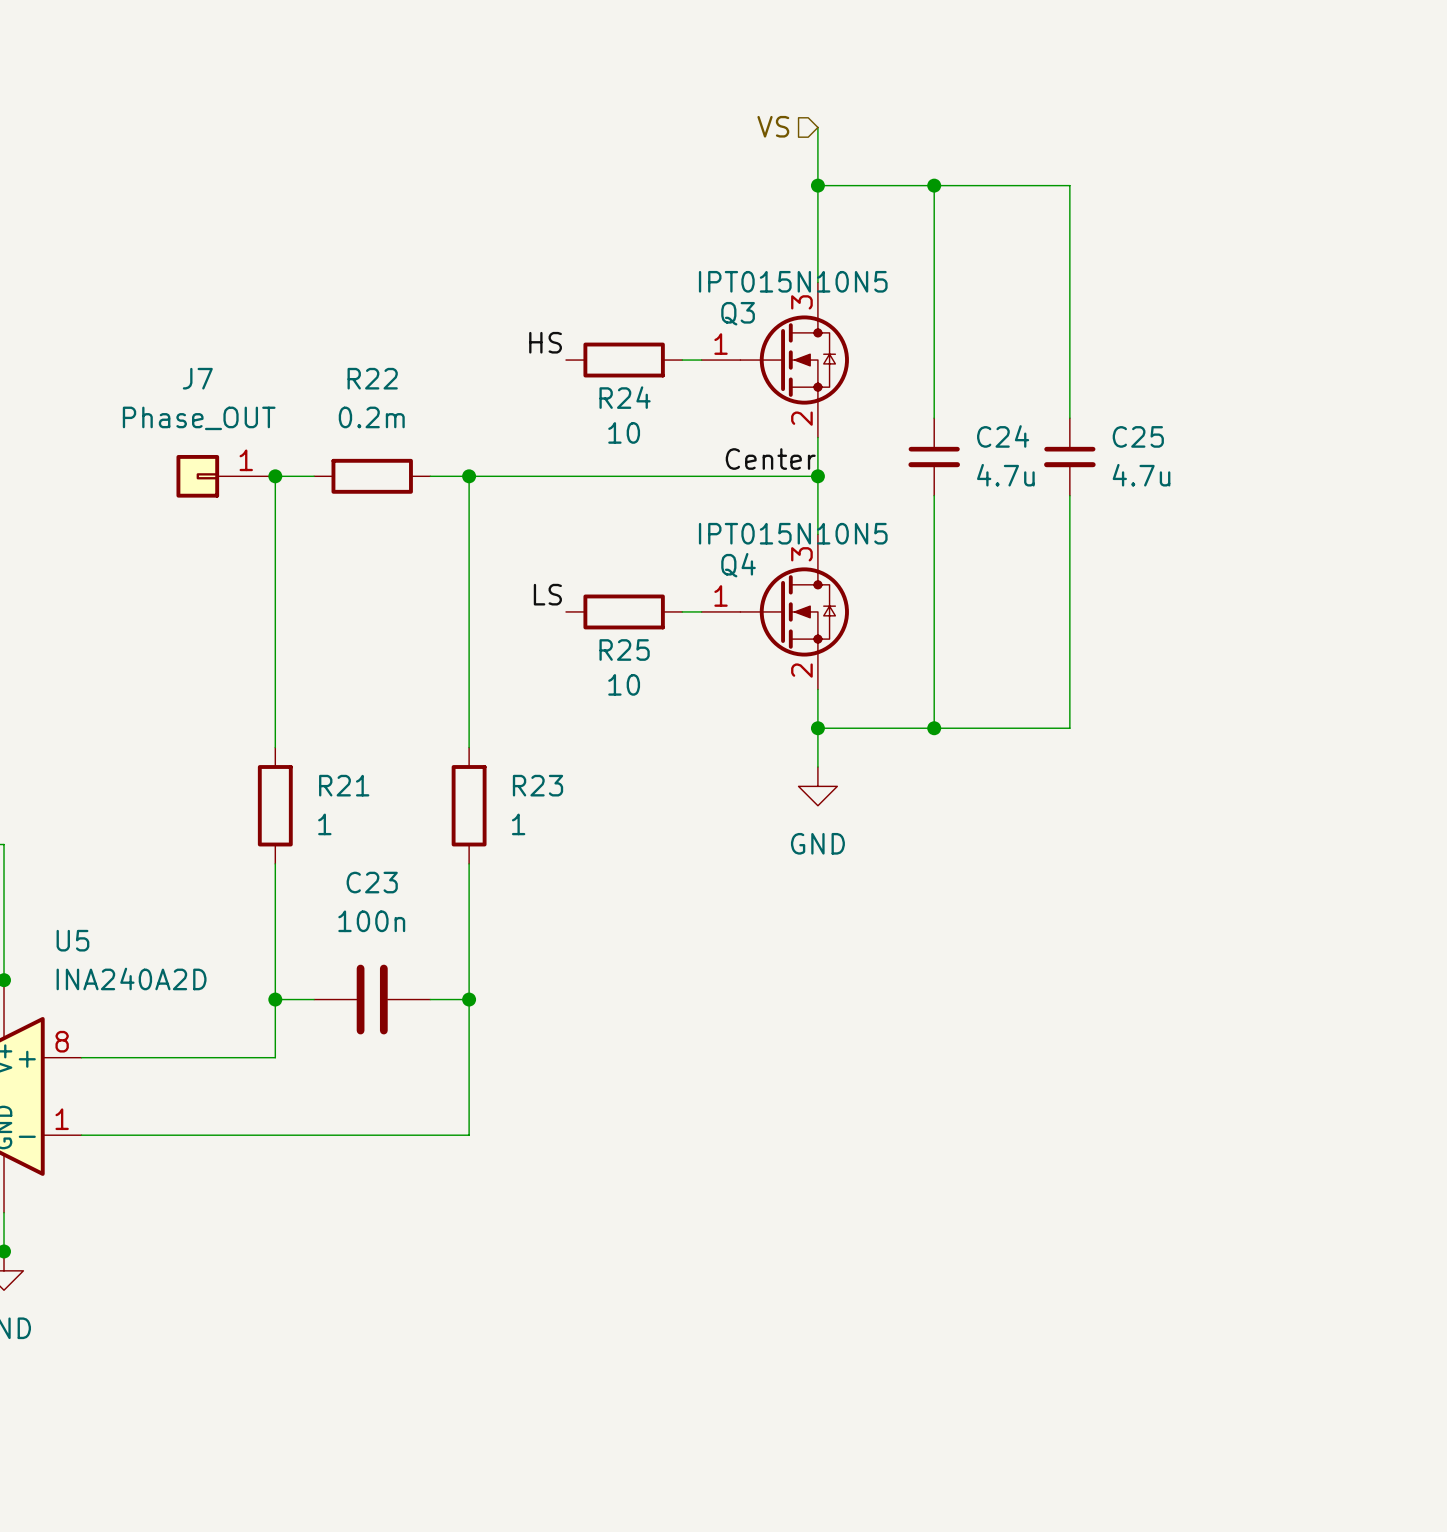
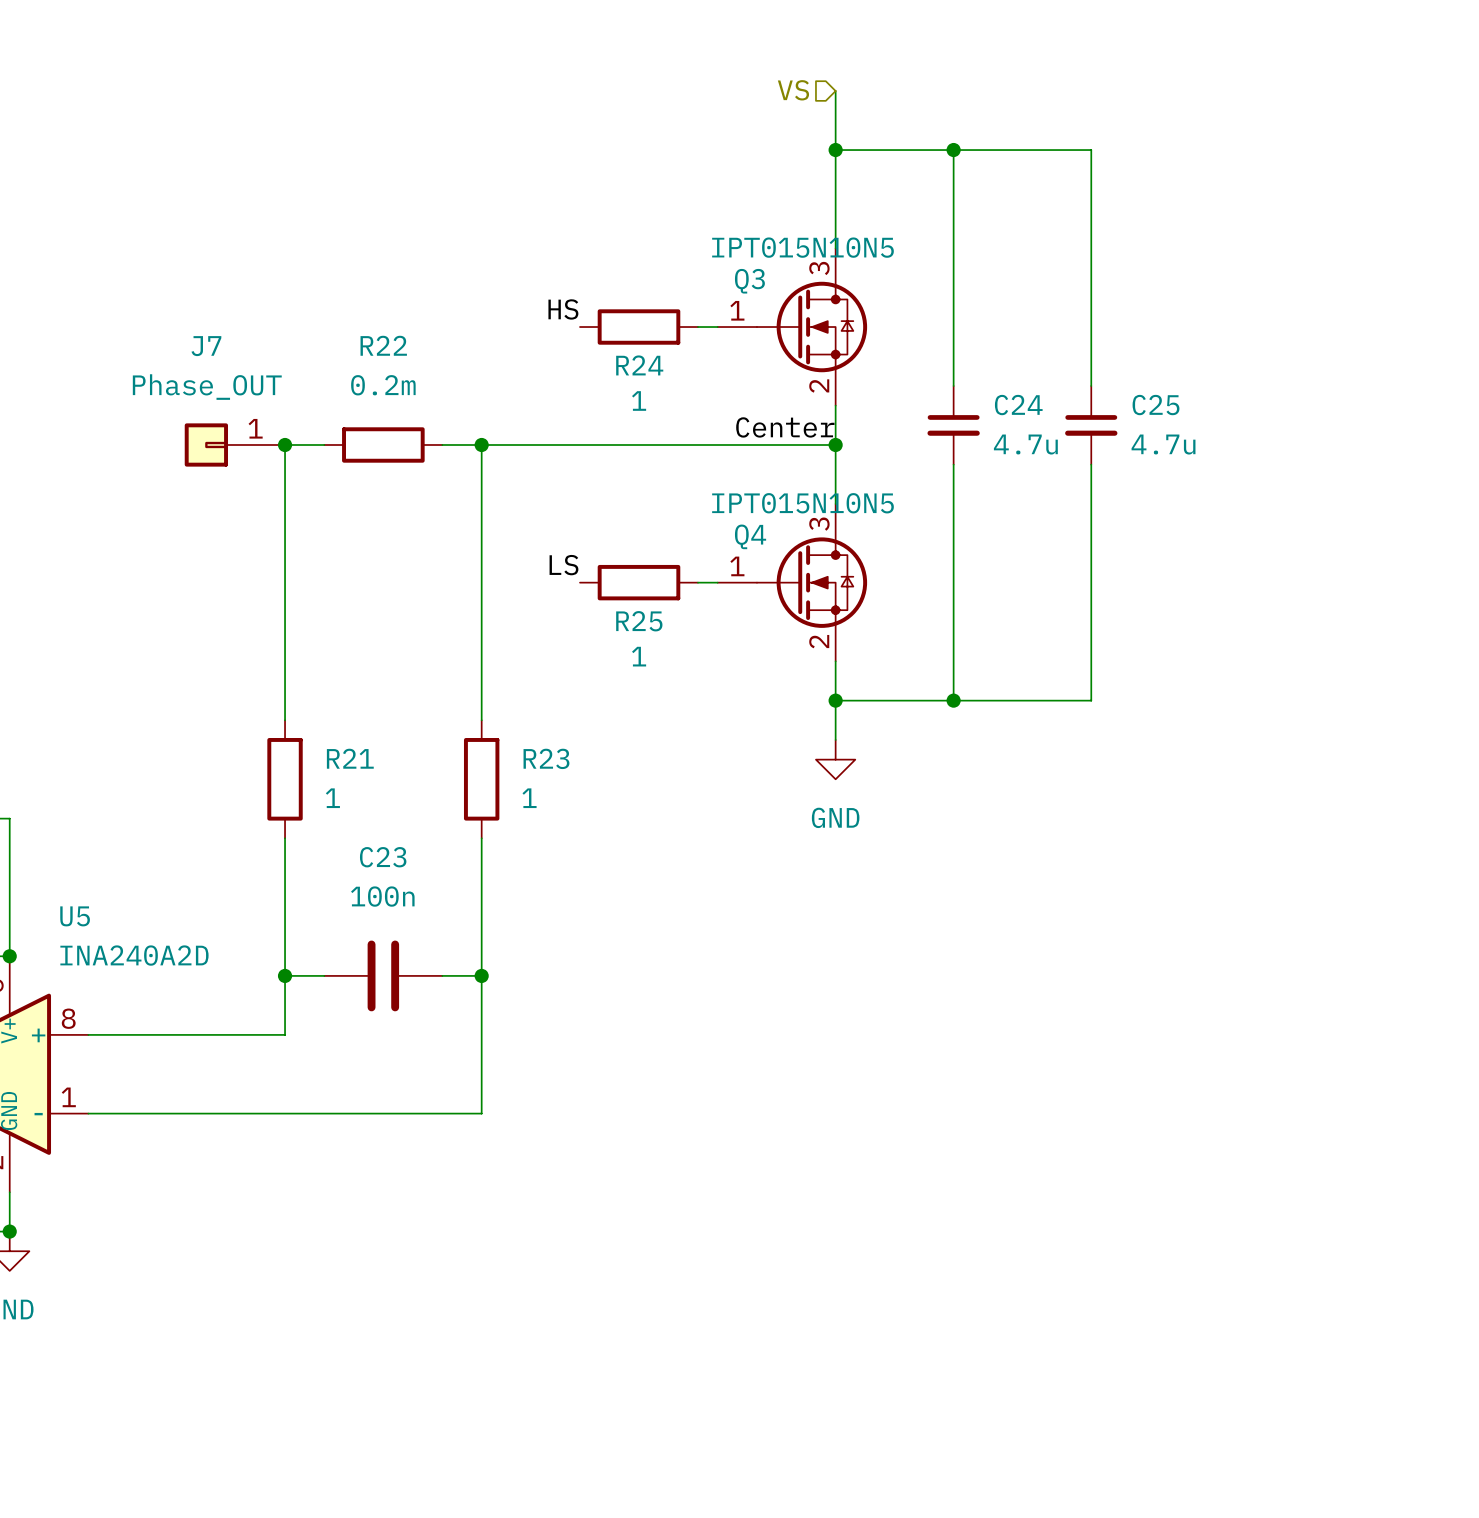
R24 value: 10 (624, 432) -> 1 (639, 401)
R25 value: 10 (624, 684) -> 1 (639, 656)

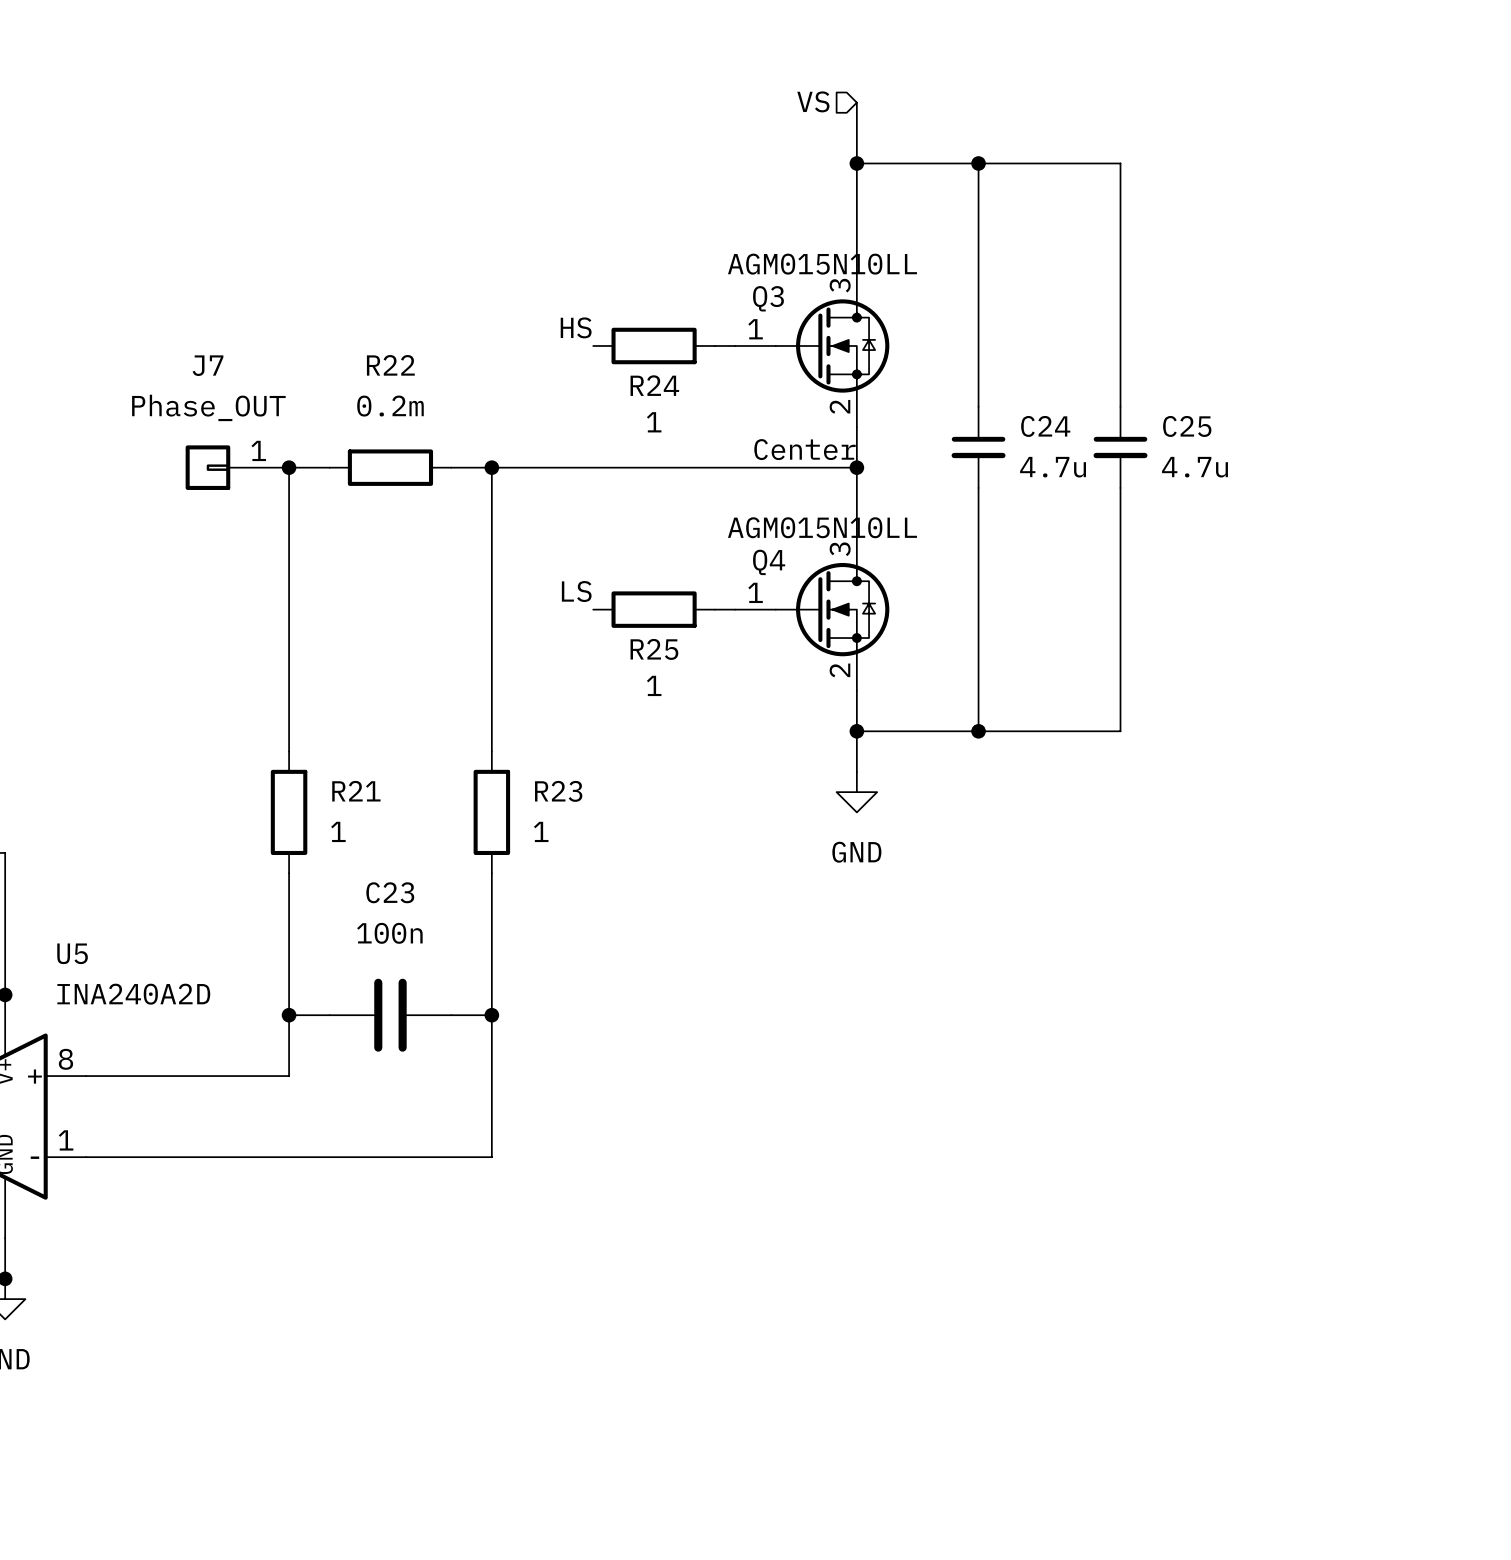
Q3 value: IPT015N10N5 (802, 247) -> AGM015N10LL (822, 264)
Q4 value: IPT015N10N5 (802, 503) -> AGM015N10LL (822, 527)

